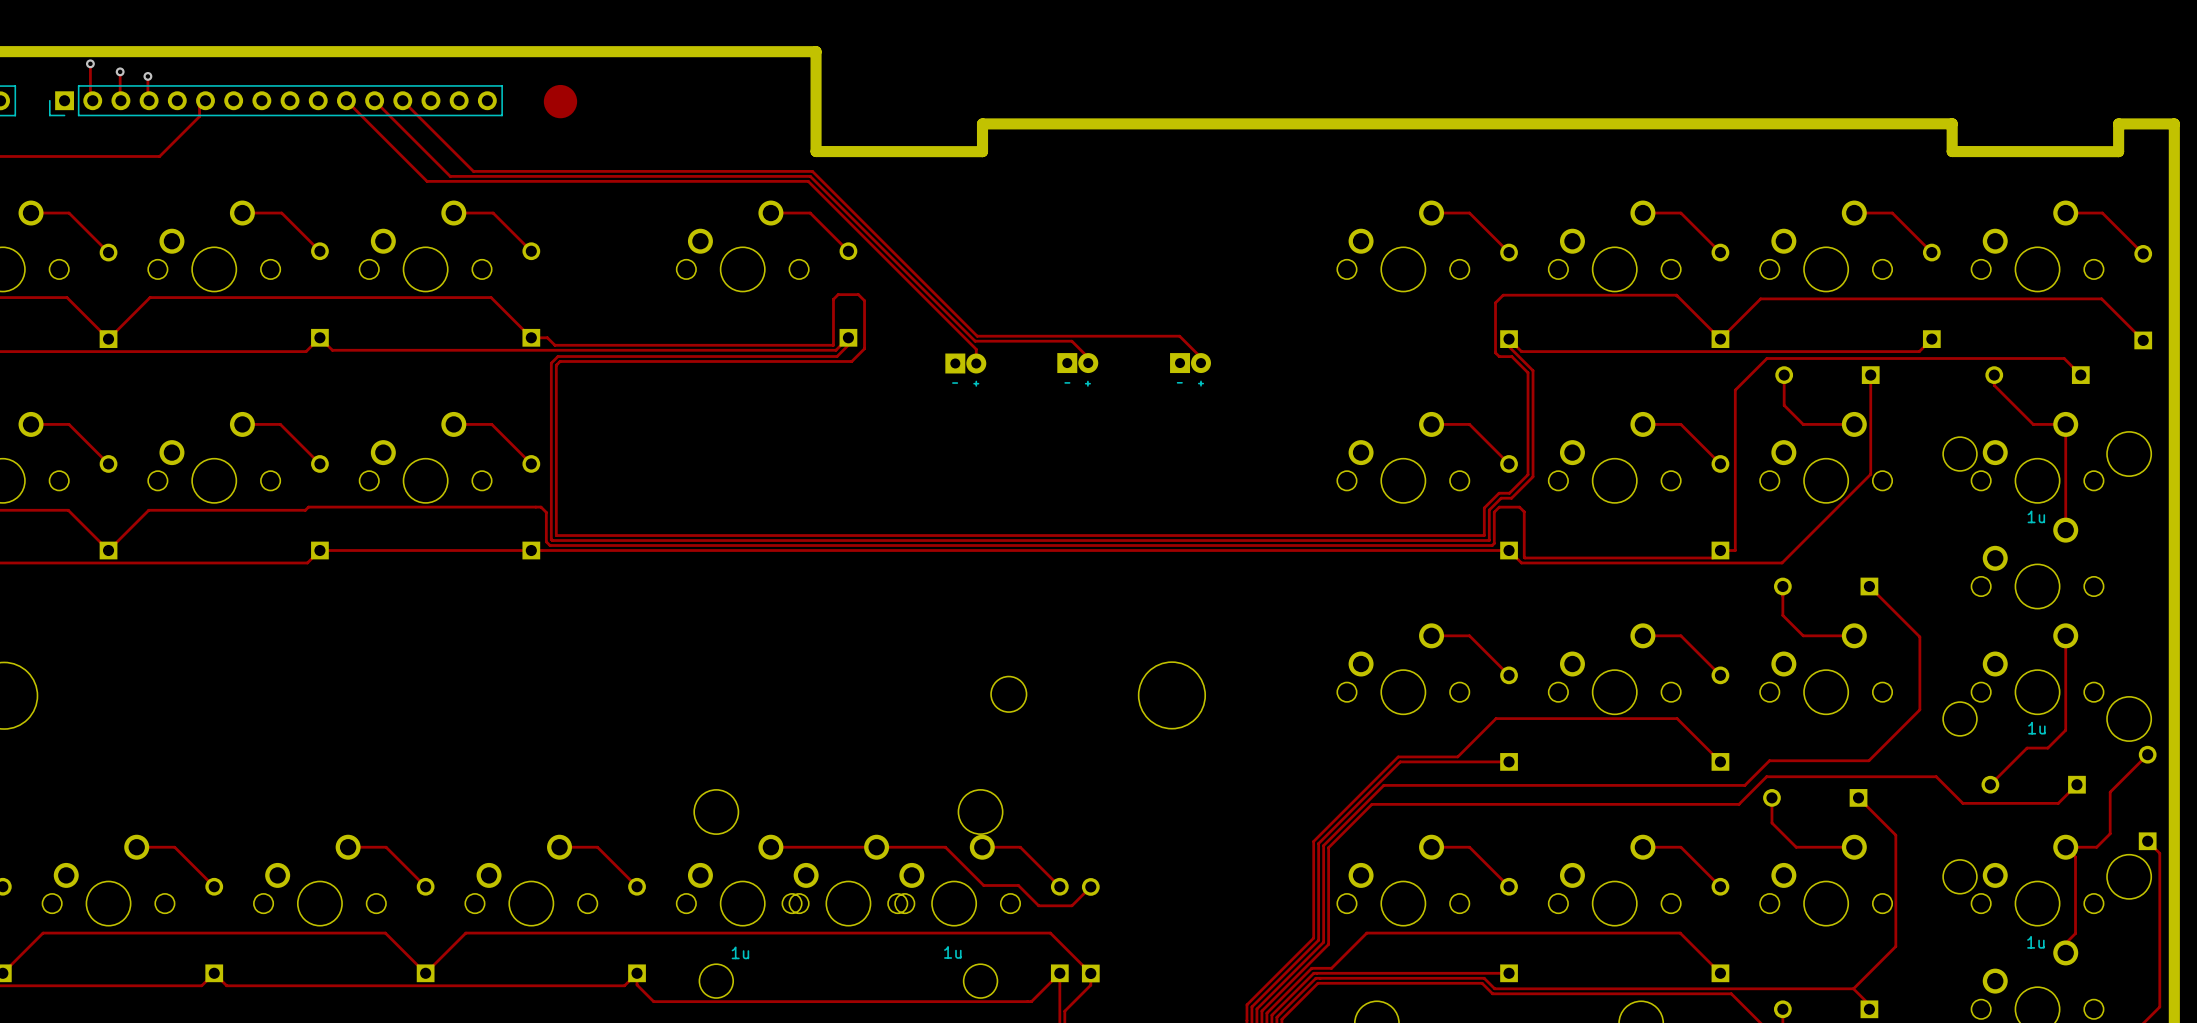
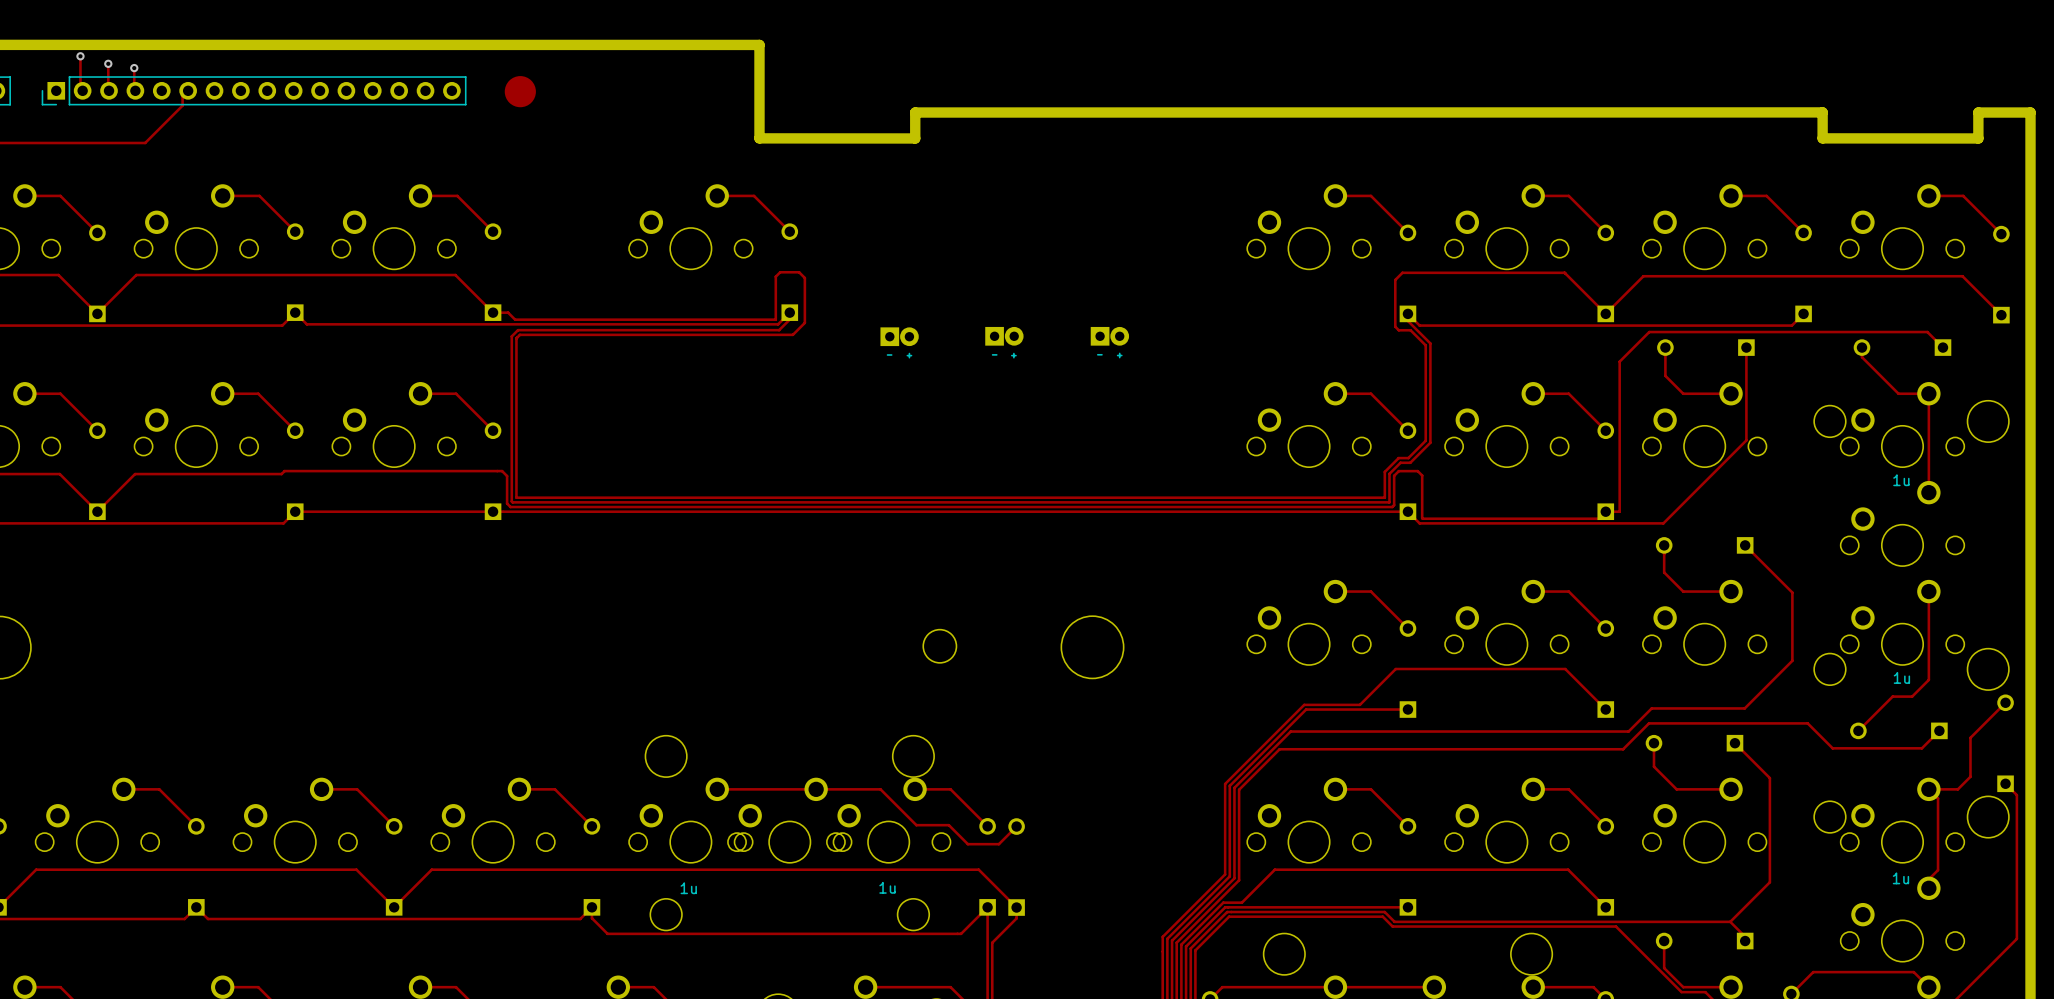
track: (346, 100) (427, 181) (808, 181) (976, 349) (976, 363) -> none
track: (374, 100) (450, 176) (810, 176) (975, 341) (1071, 341) (1088, 357) (1088, 363) -> none
track: (402, 100) (473, 171) (812, 171) (977, 336) (1179, 336) (1201, 357) (1201, 363) -> none

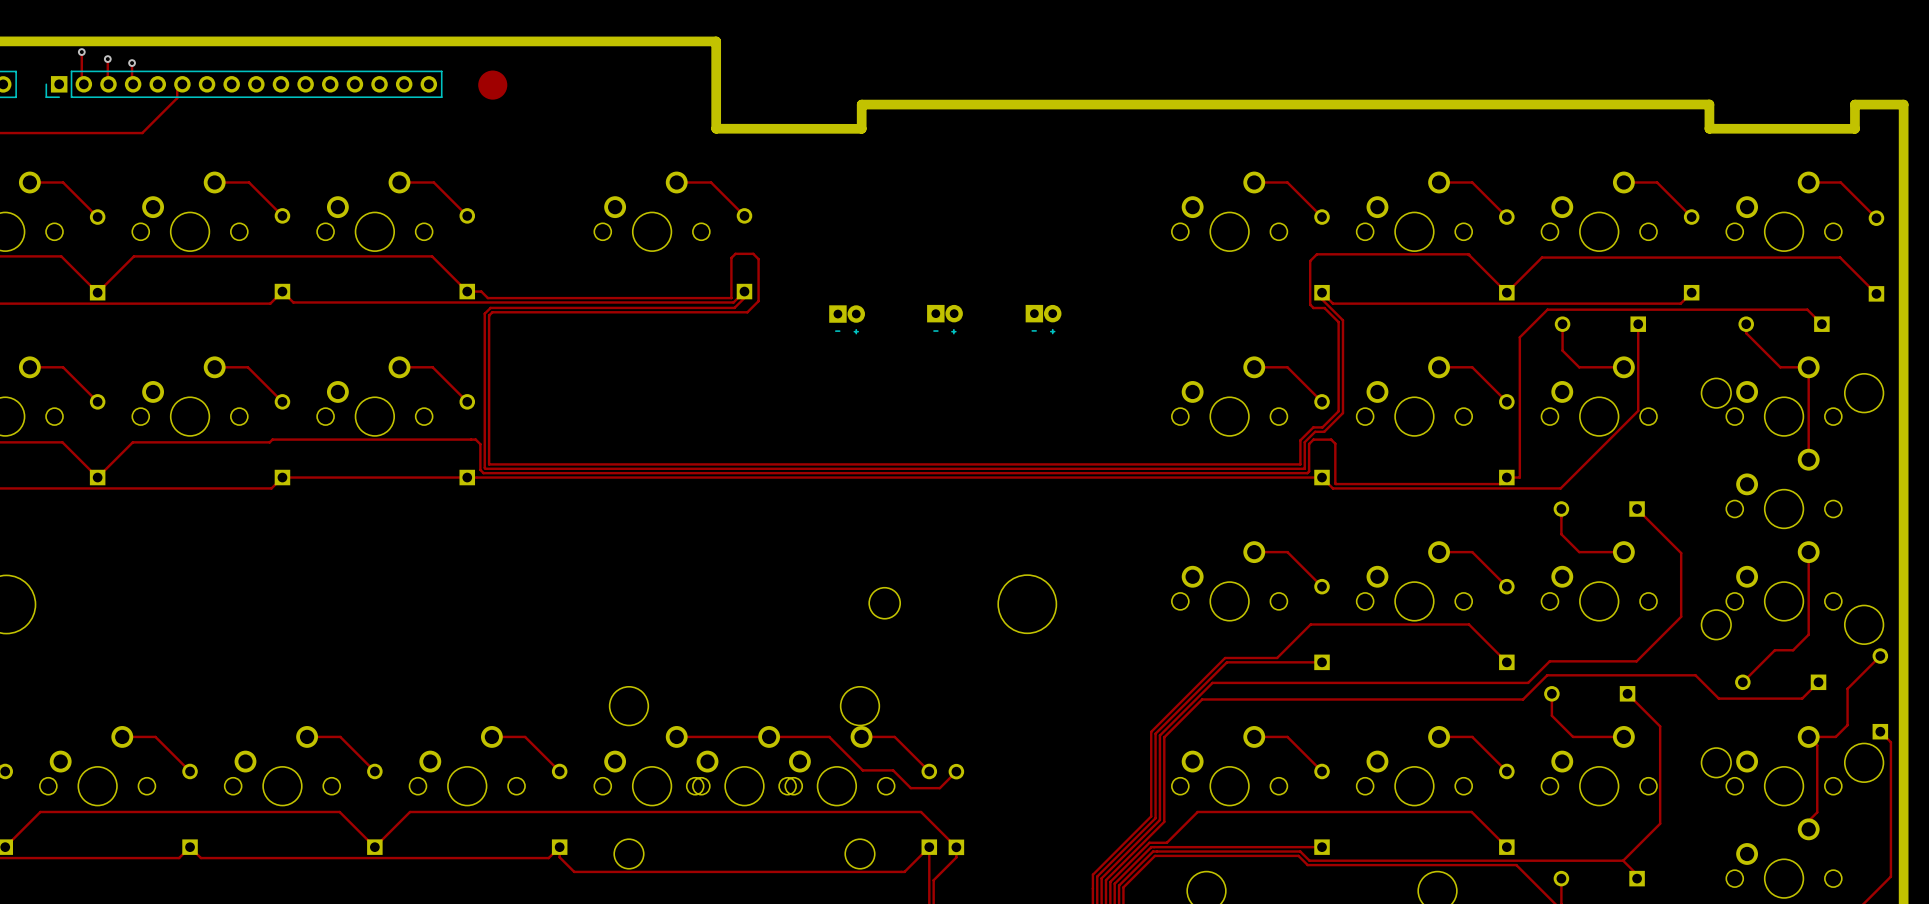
text: 1u (1901, 480) -> none
text: 1u (1901, 677) -> none
text: 1u (1900, 878) -> none
text: 1u (887, 887) -> none
text: 1u (688, 888) -> none

